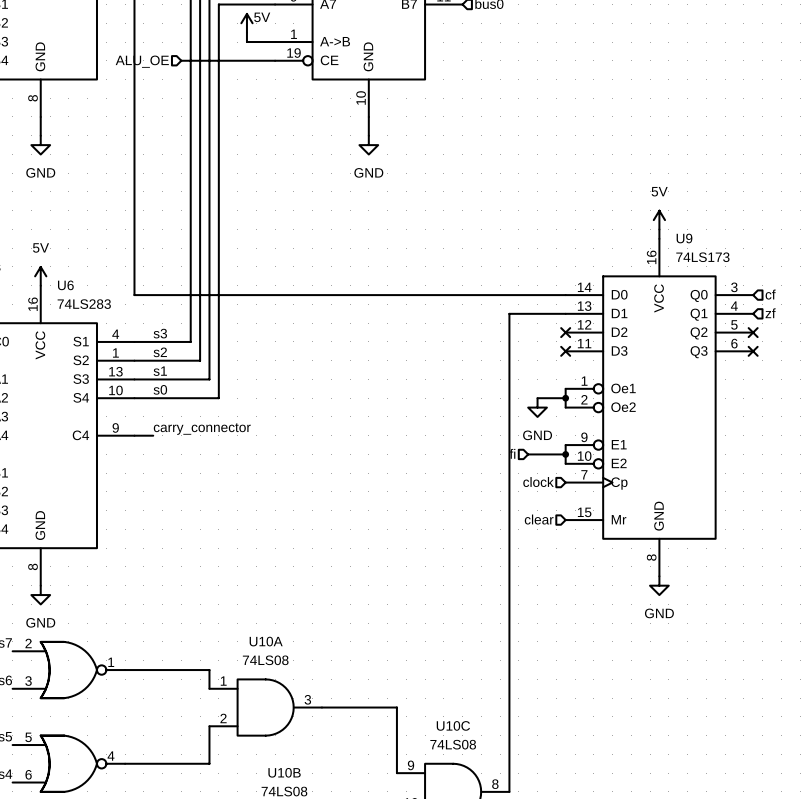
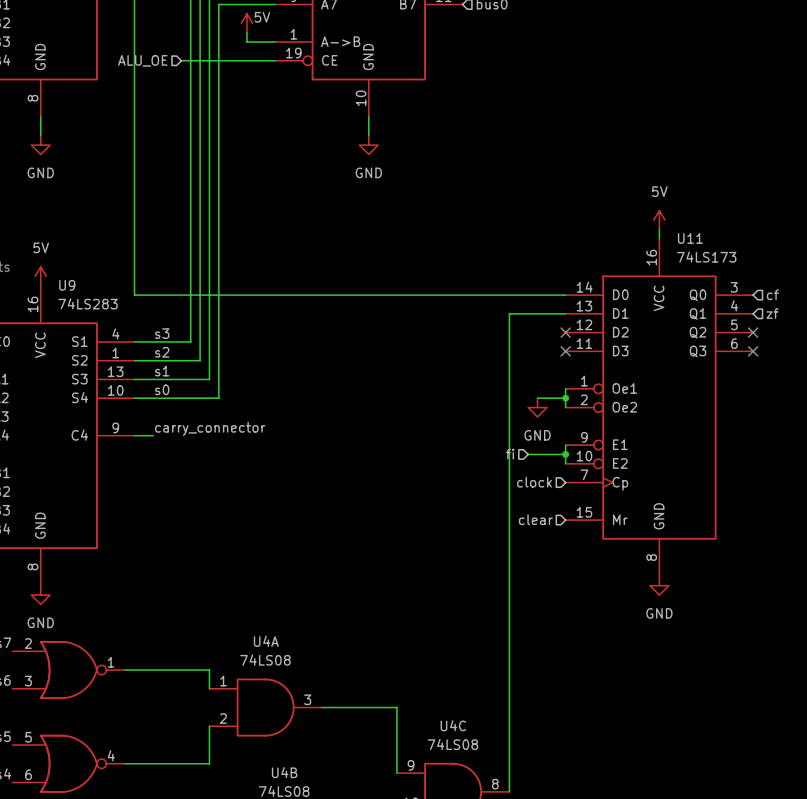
U9 name: U9 (684, 238) -> U11 (690, 238)
U6 name: U6 (65, 285) -> U9 (67, 285)
U10A name: U10A (266, 641) -> U4A (266, 641)
U10C name: U10C (453, 725) -> U4C (453, 725)
U10B name: U10B (284, 772) -> U4B (284, 772)

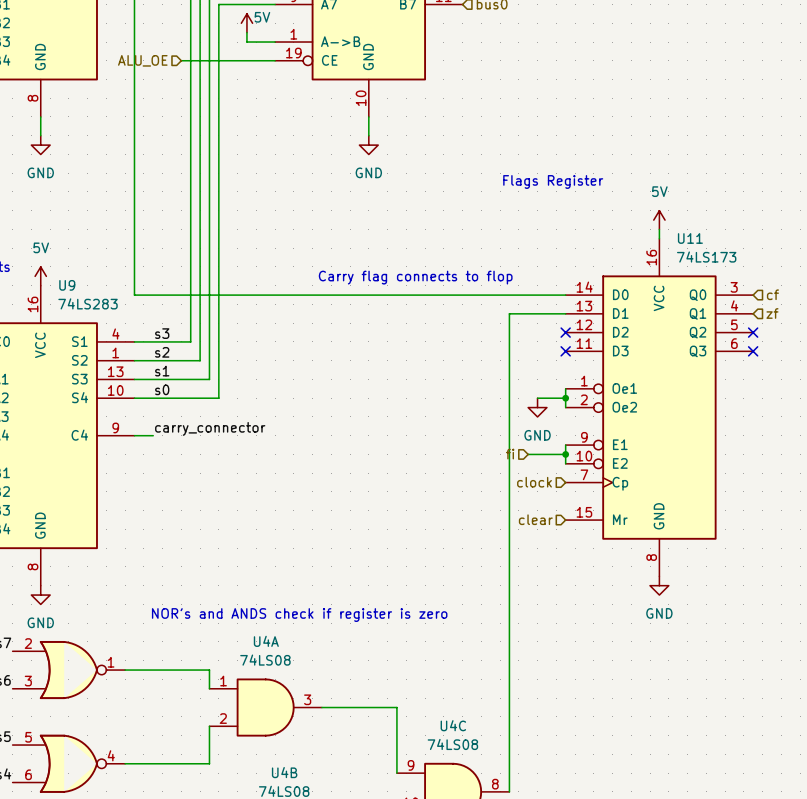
text: none -> Flags Register (553, 181)
text: none -> Carry flag connects to flop (415, 277)
text: none -> NOR's and ANDS check if register is zero (299, 615)

